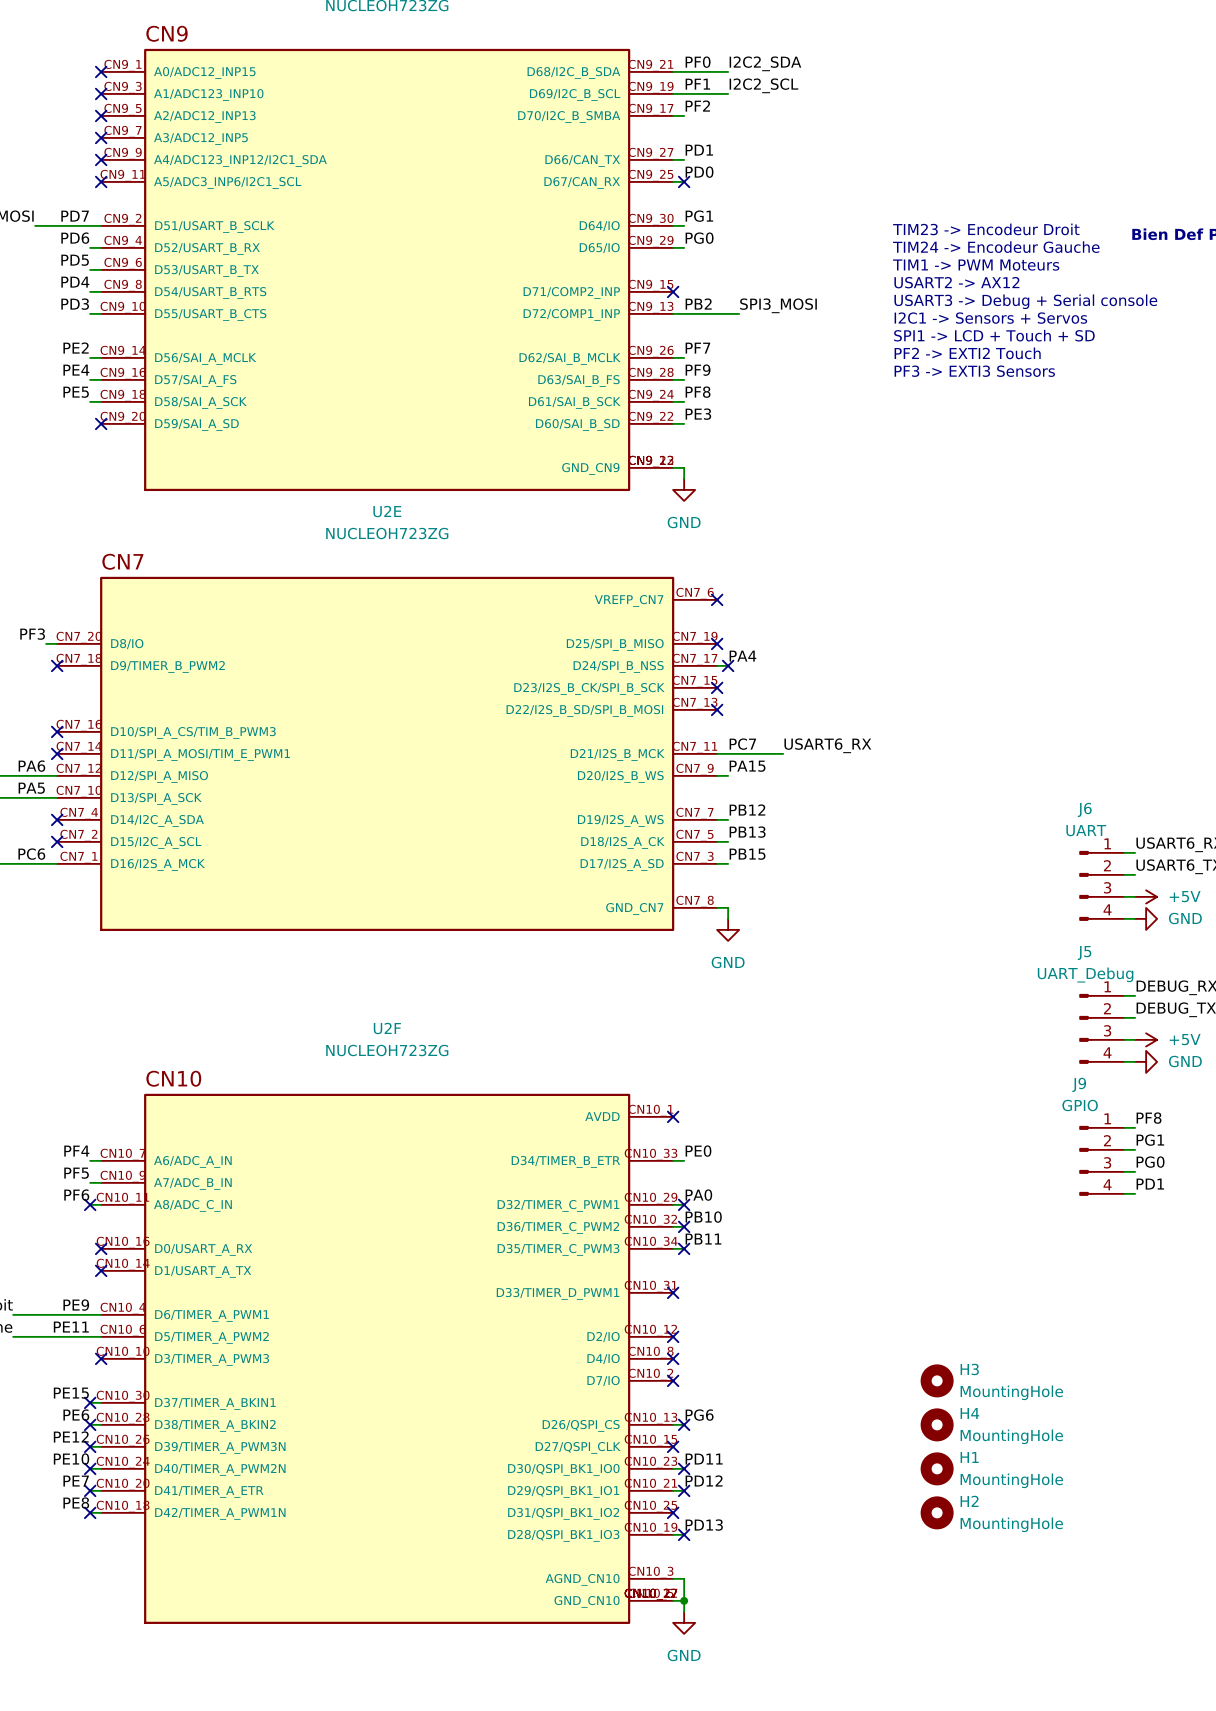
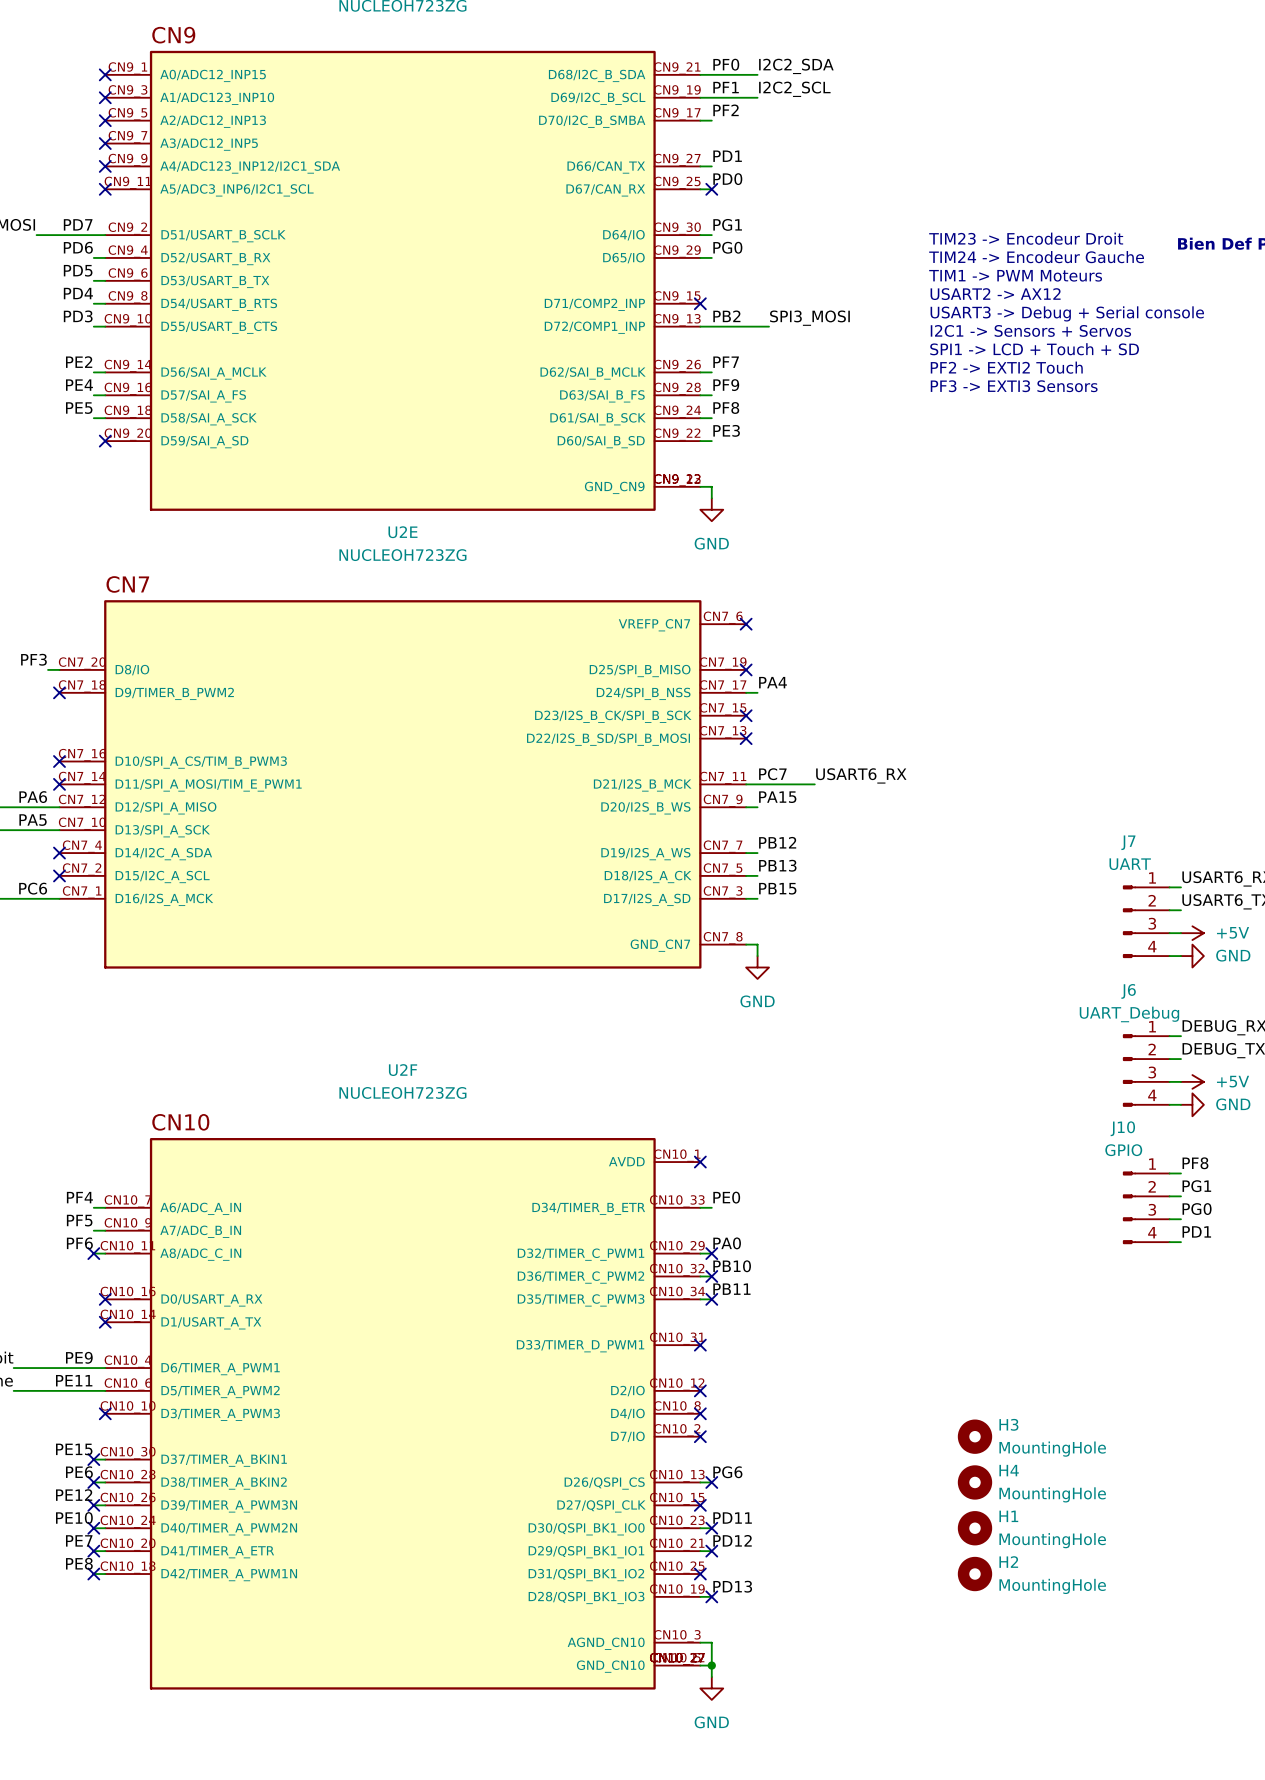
no-connect mark: (728, 665) -> none
J6 name: J6 (1084, 809) -> J7 (1128, 842)
J5 name: J5 (1084, 953) -> J6 (1128, 991)
J9 name: J9 (1079, 1084) -> J10 (1122, 1128)

